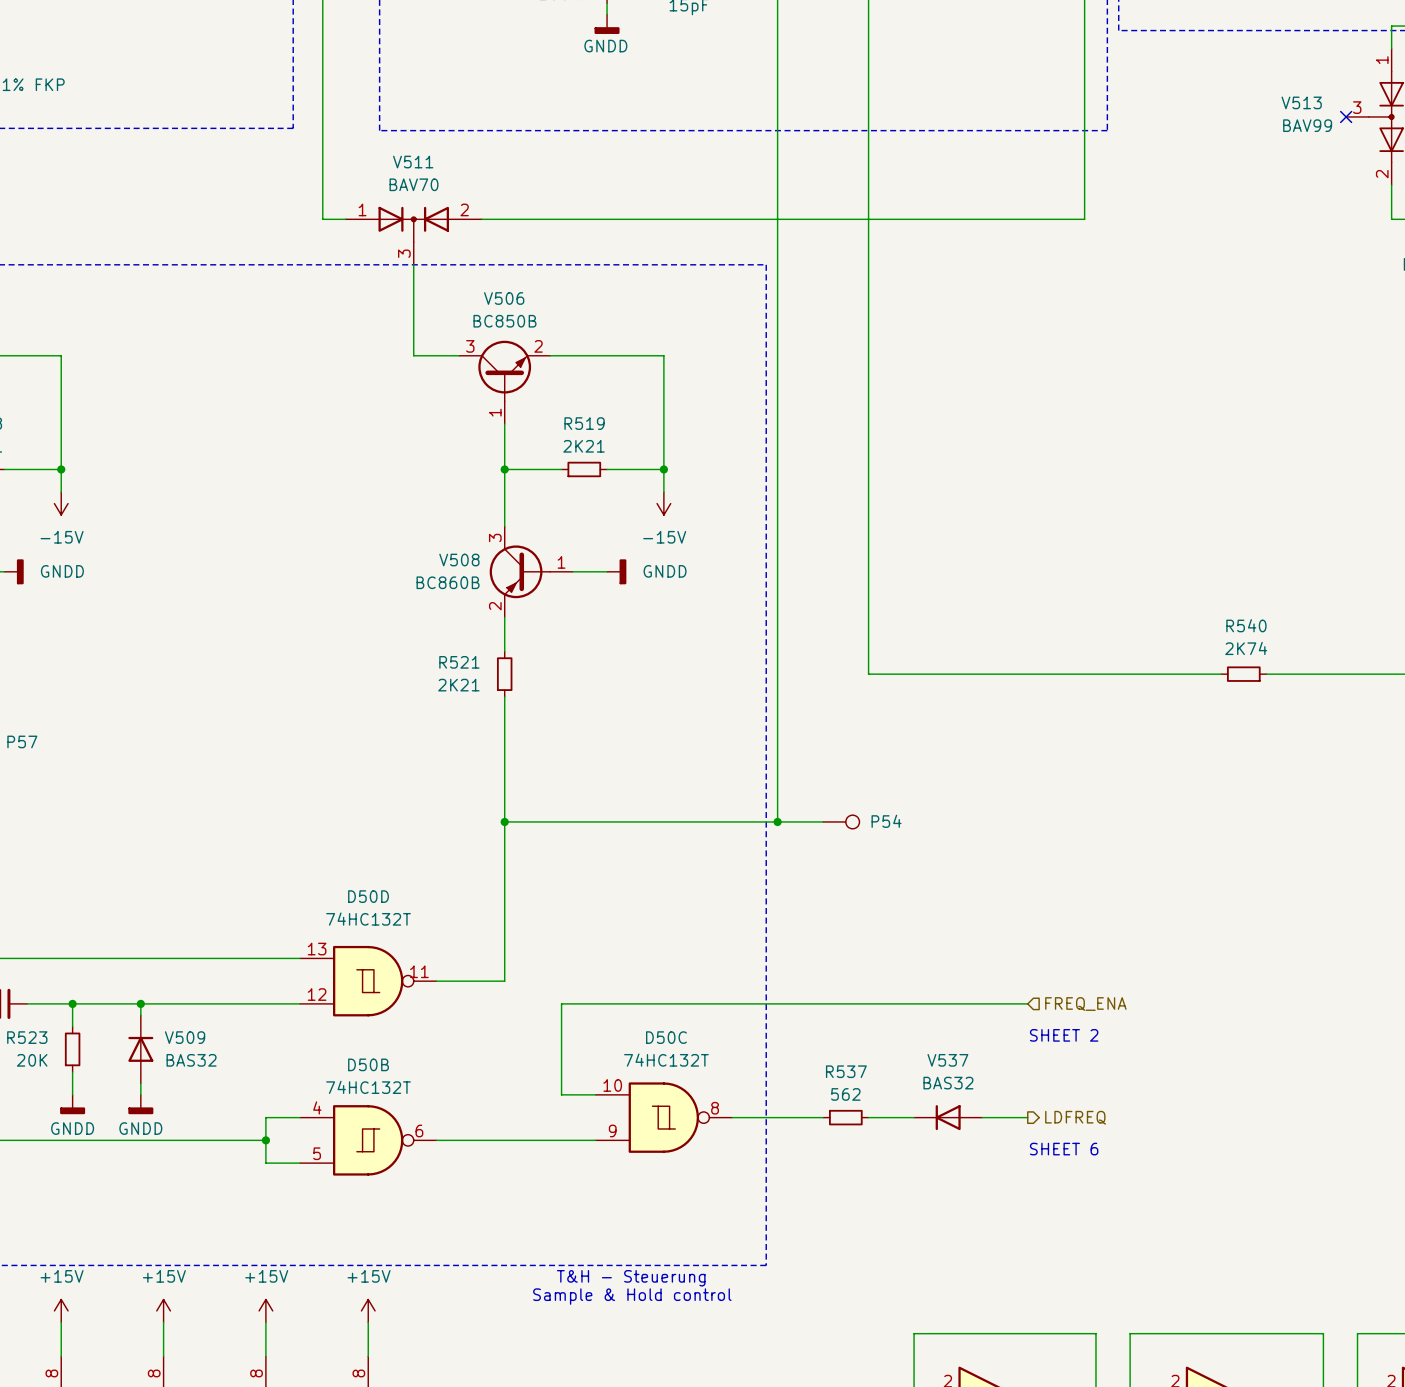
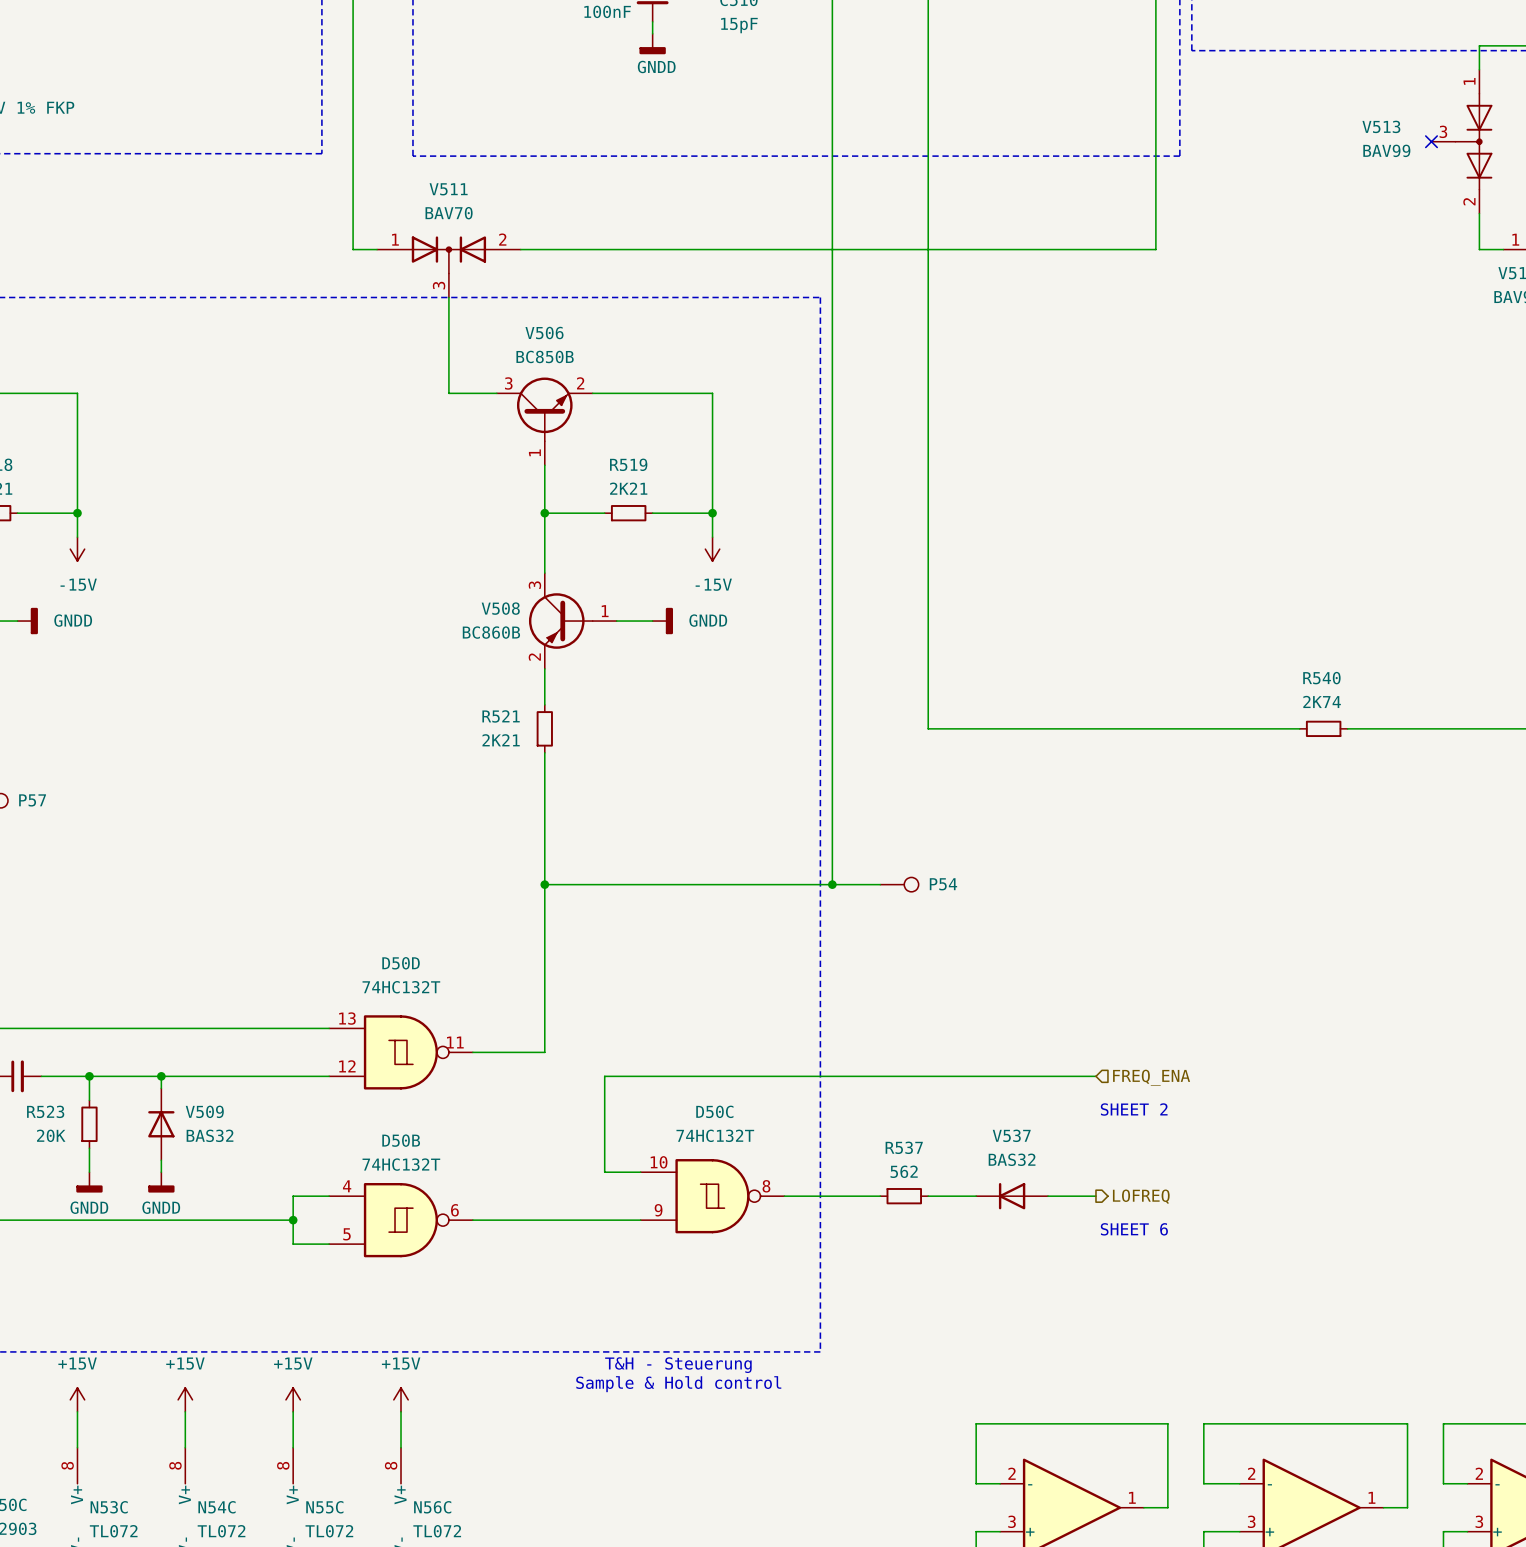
hierarchical label: LDFREQ (1075, 1117) -> LOFREQ (1141, 1196)

